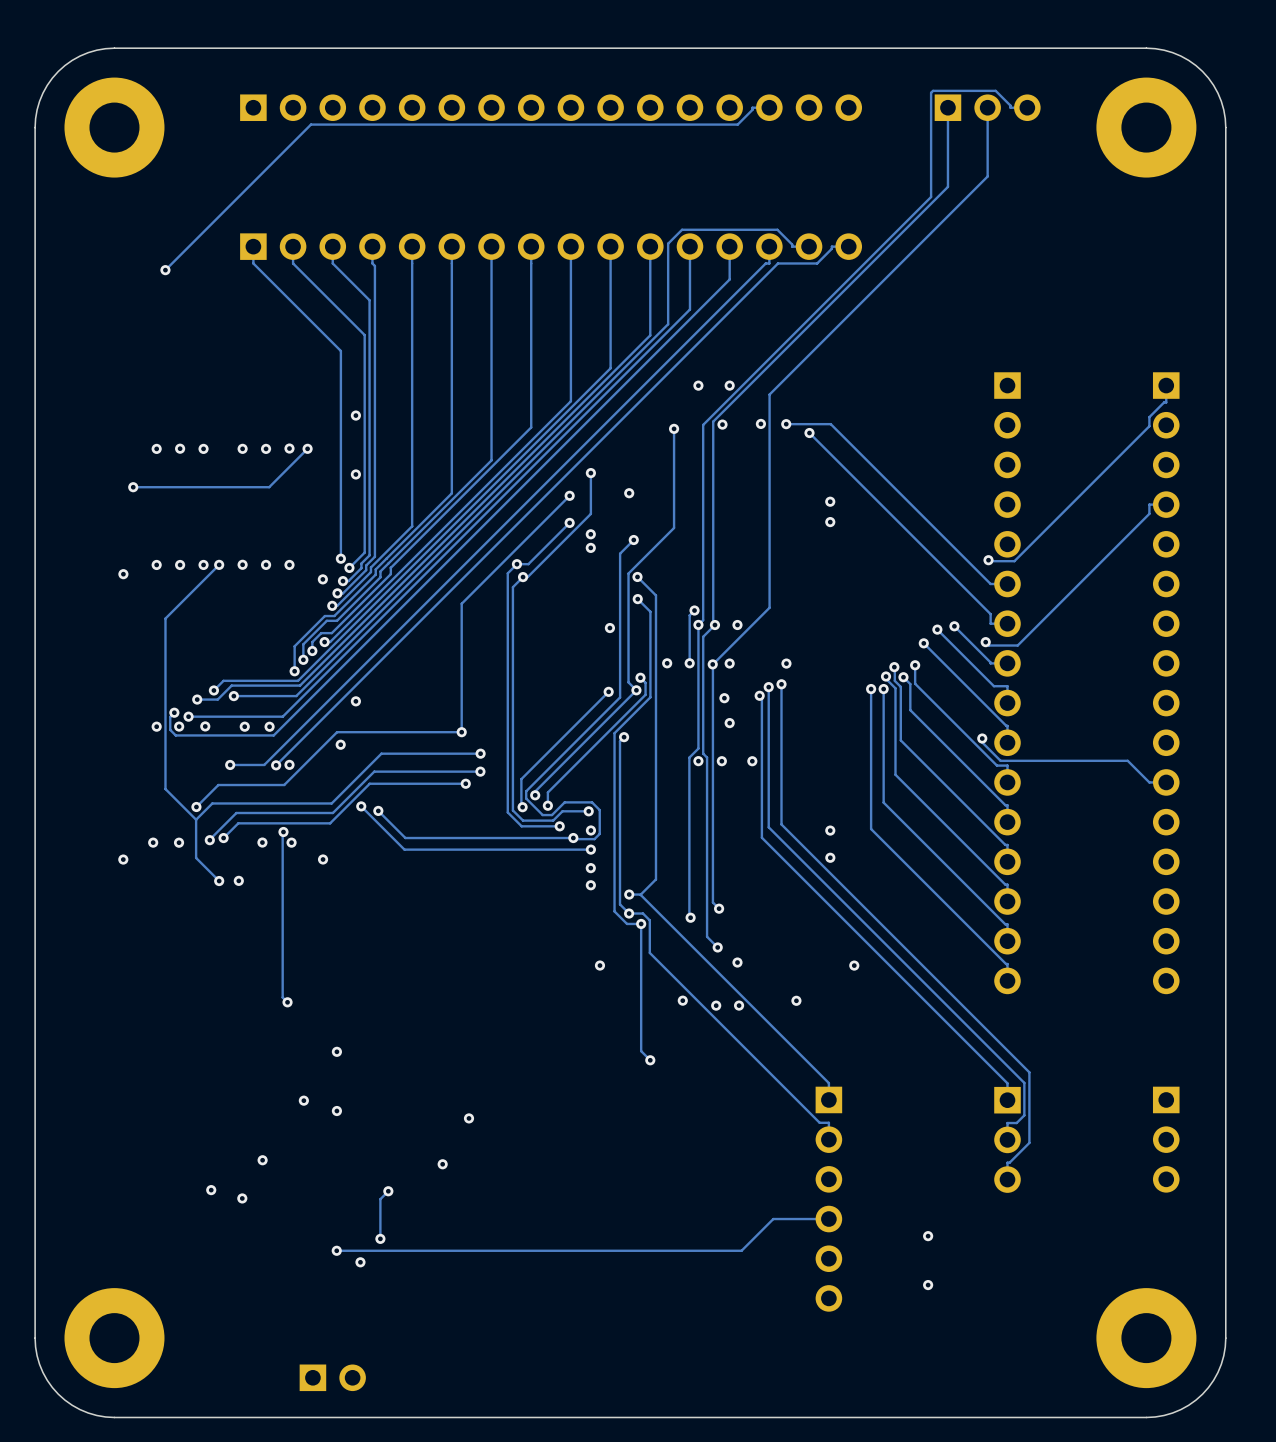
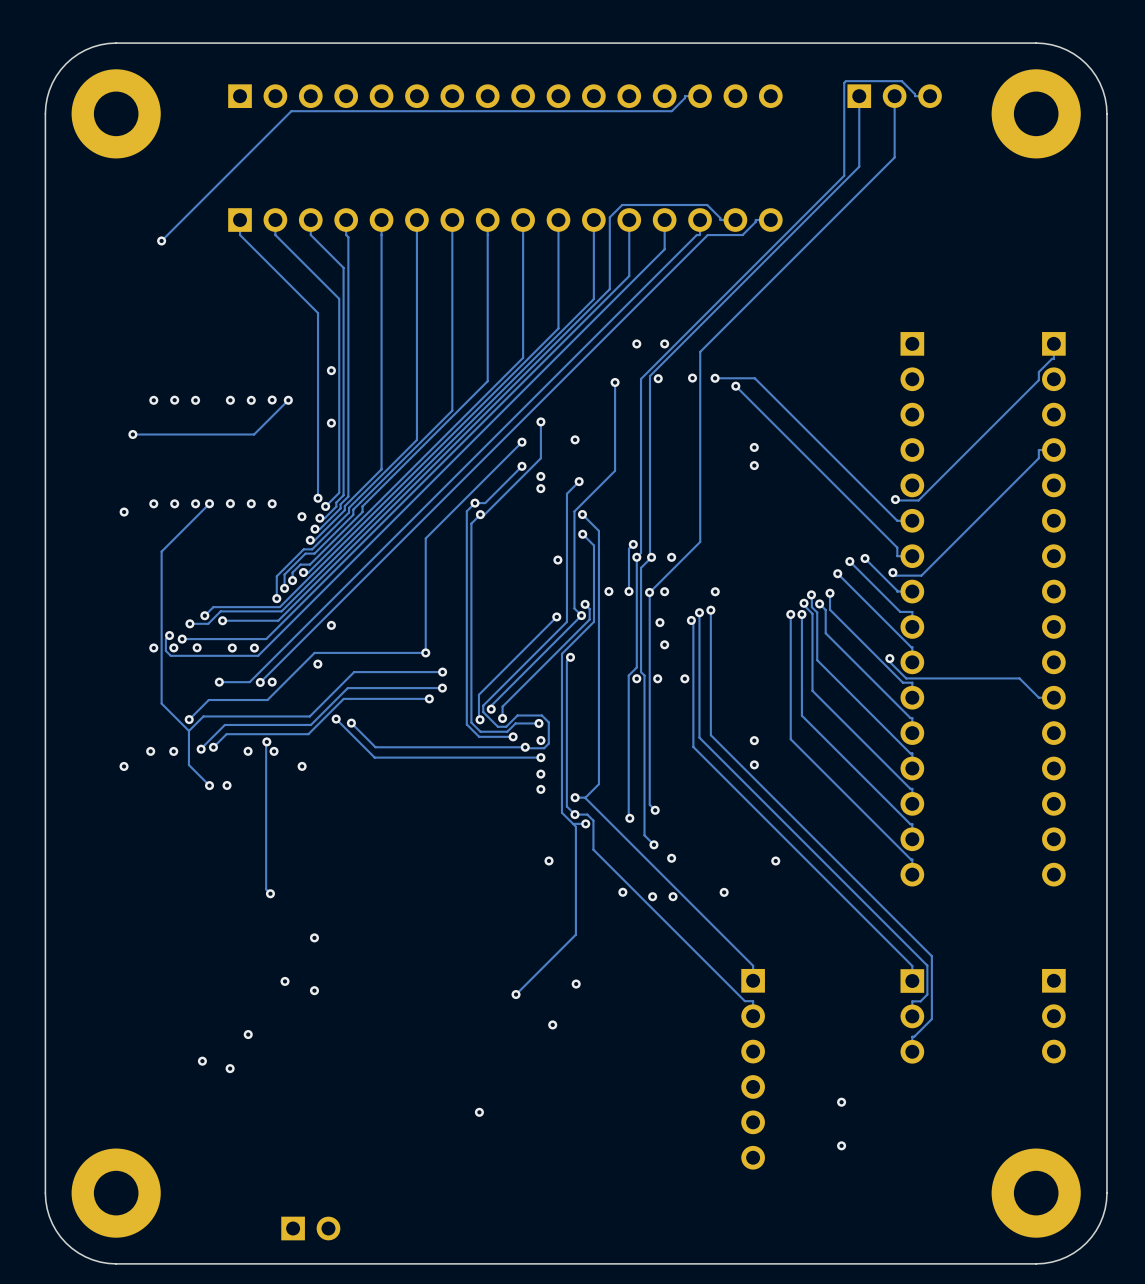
track: none -> (573, 823) (575, 826) (575, 934) (516, 994)
track: (641, 923) (641, 1051) (650, 1060) -> none
via position: (650, 1060) -> (576, 984)
via: none -> (516, 994)
via: (469, 1118) -> none
via: none -> (552, 1024)
via: (442, 1164) -> none
track: (388, 1191) (380, 1199) (380, 1238) -> none
via: (388, 1191) -> none
track: (828, 1219) (773, 1219) (741, 1250) (336, 1250) -> none
via: (380, 1238) -> none
via: none -> (479, 1112)
via: (336, 1250) -> none
via: (360, 1262) -> none

